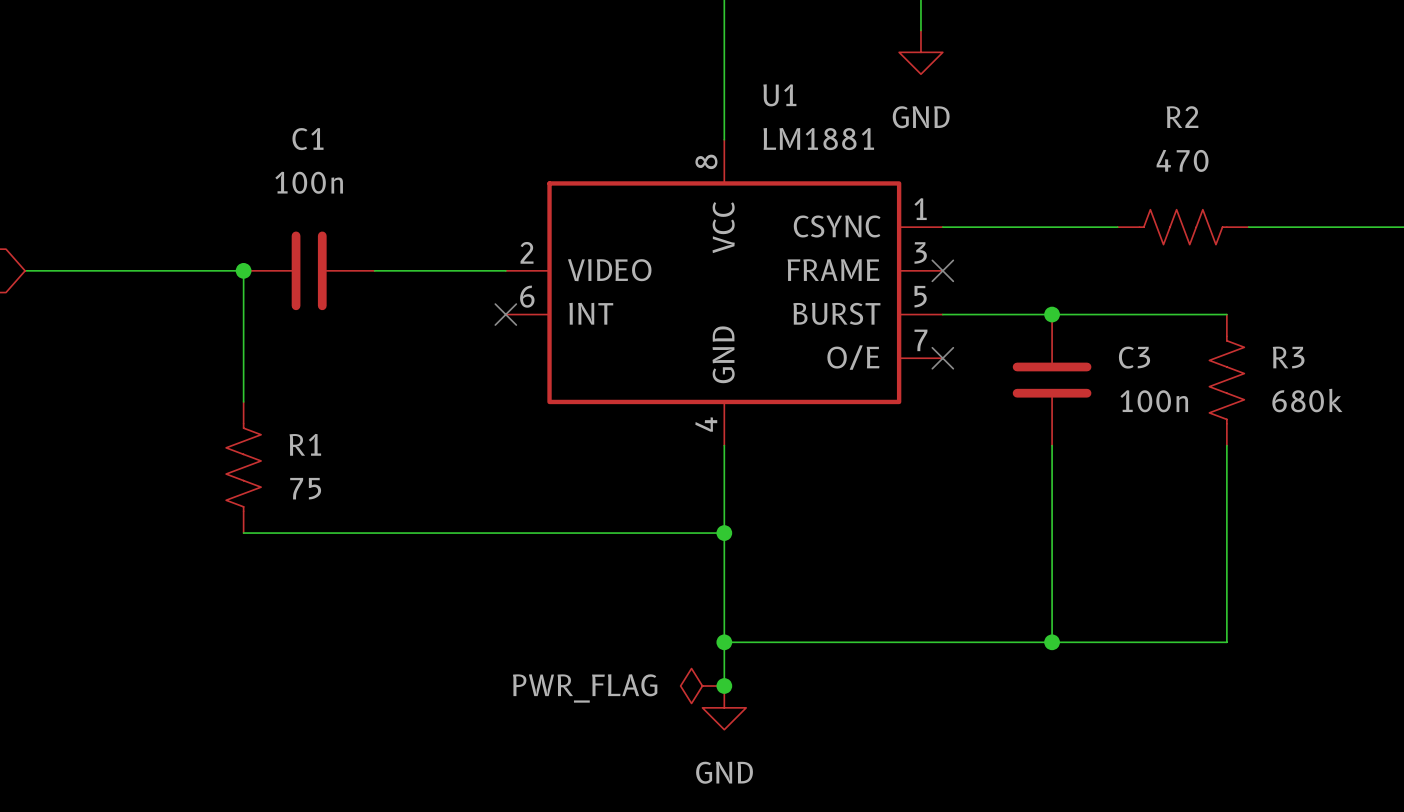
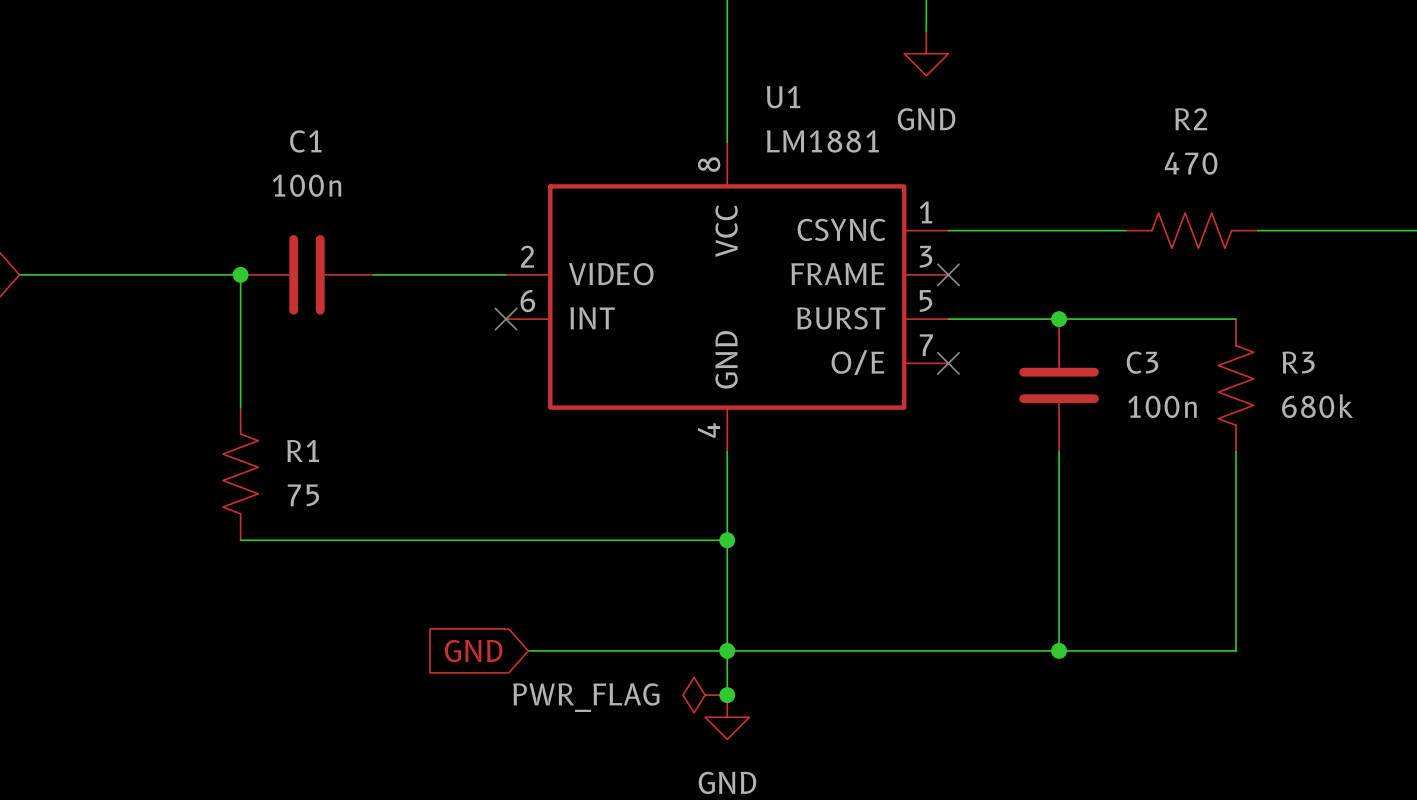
global label: none -> GND (473, 651)
wire: none -> (528, 650) (727, 650)

